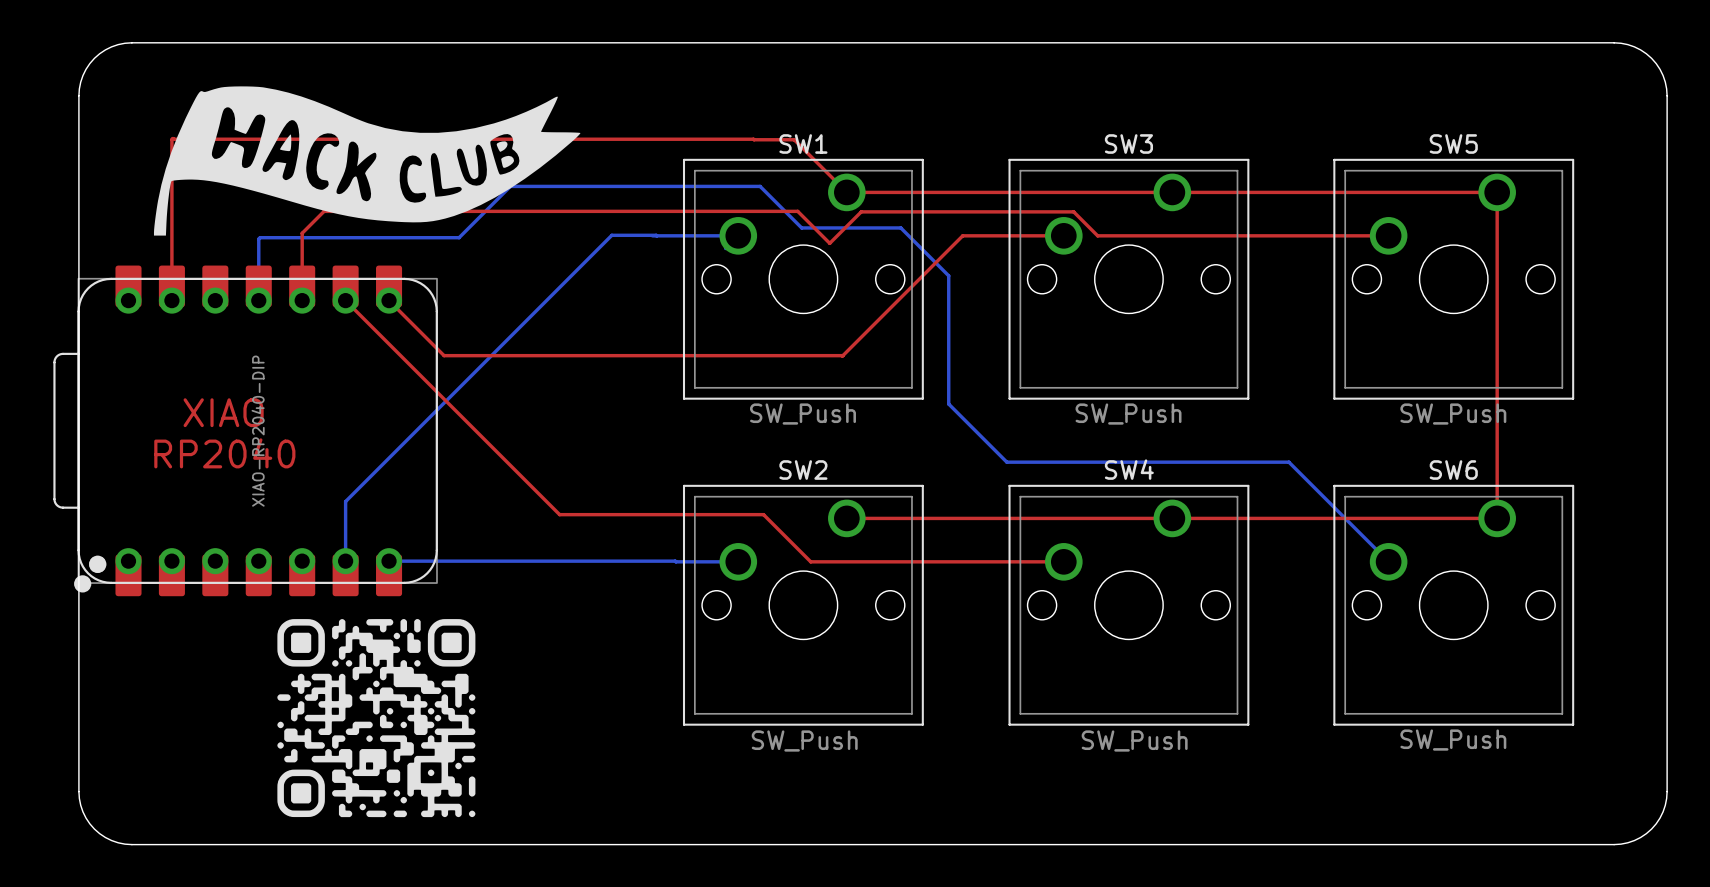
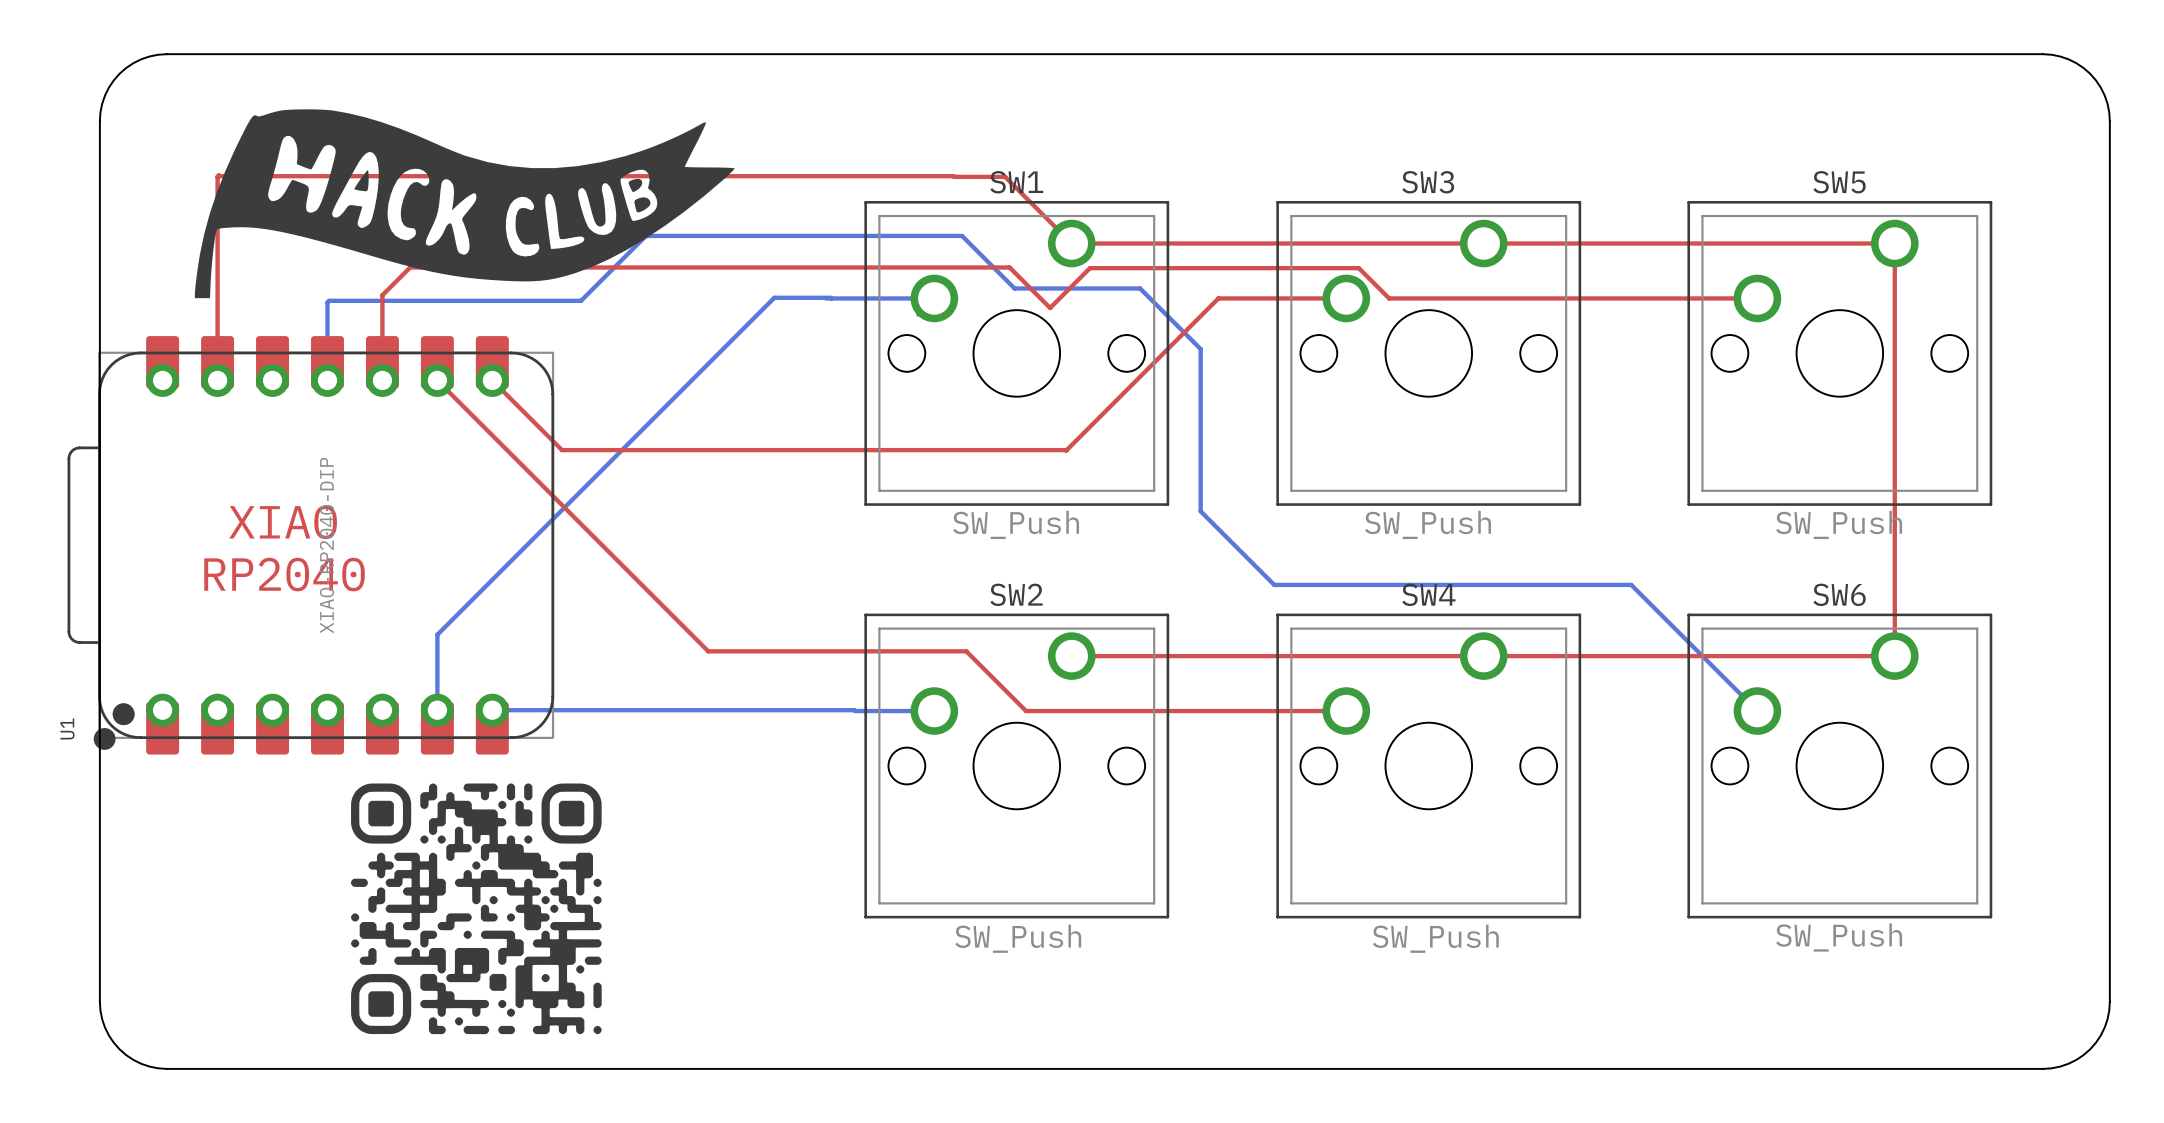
U1 name: none -> U1 (67, 728)

